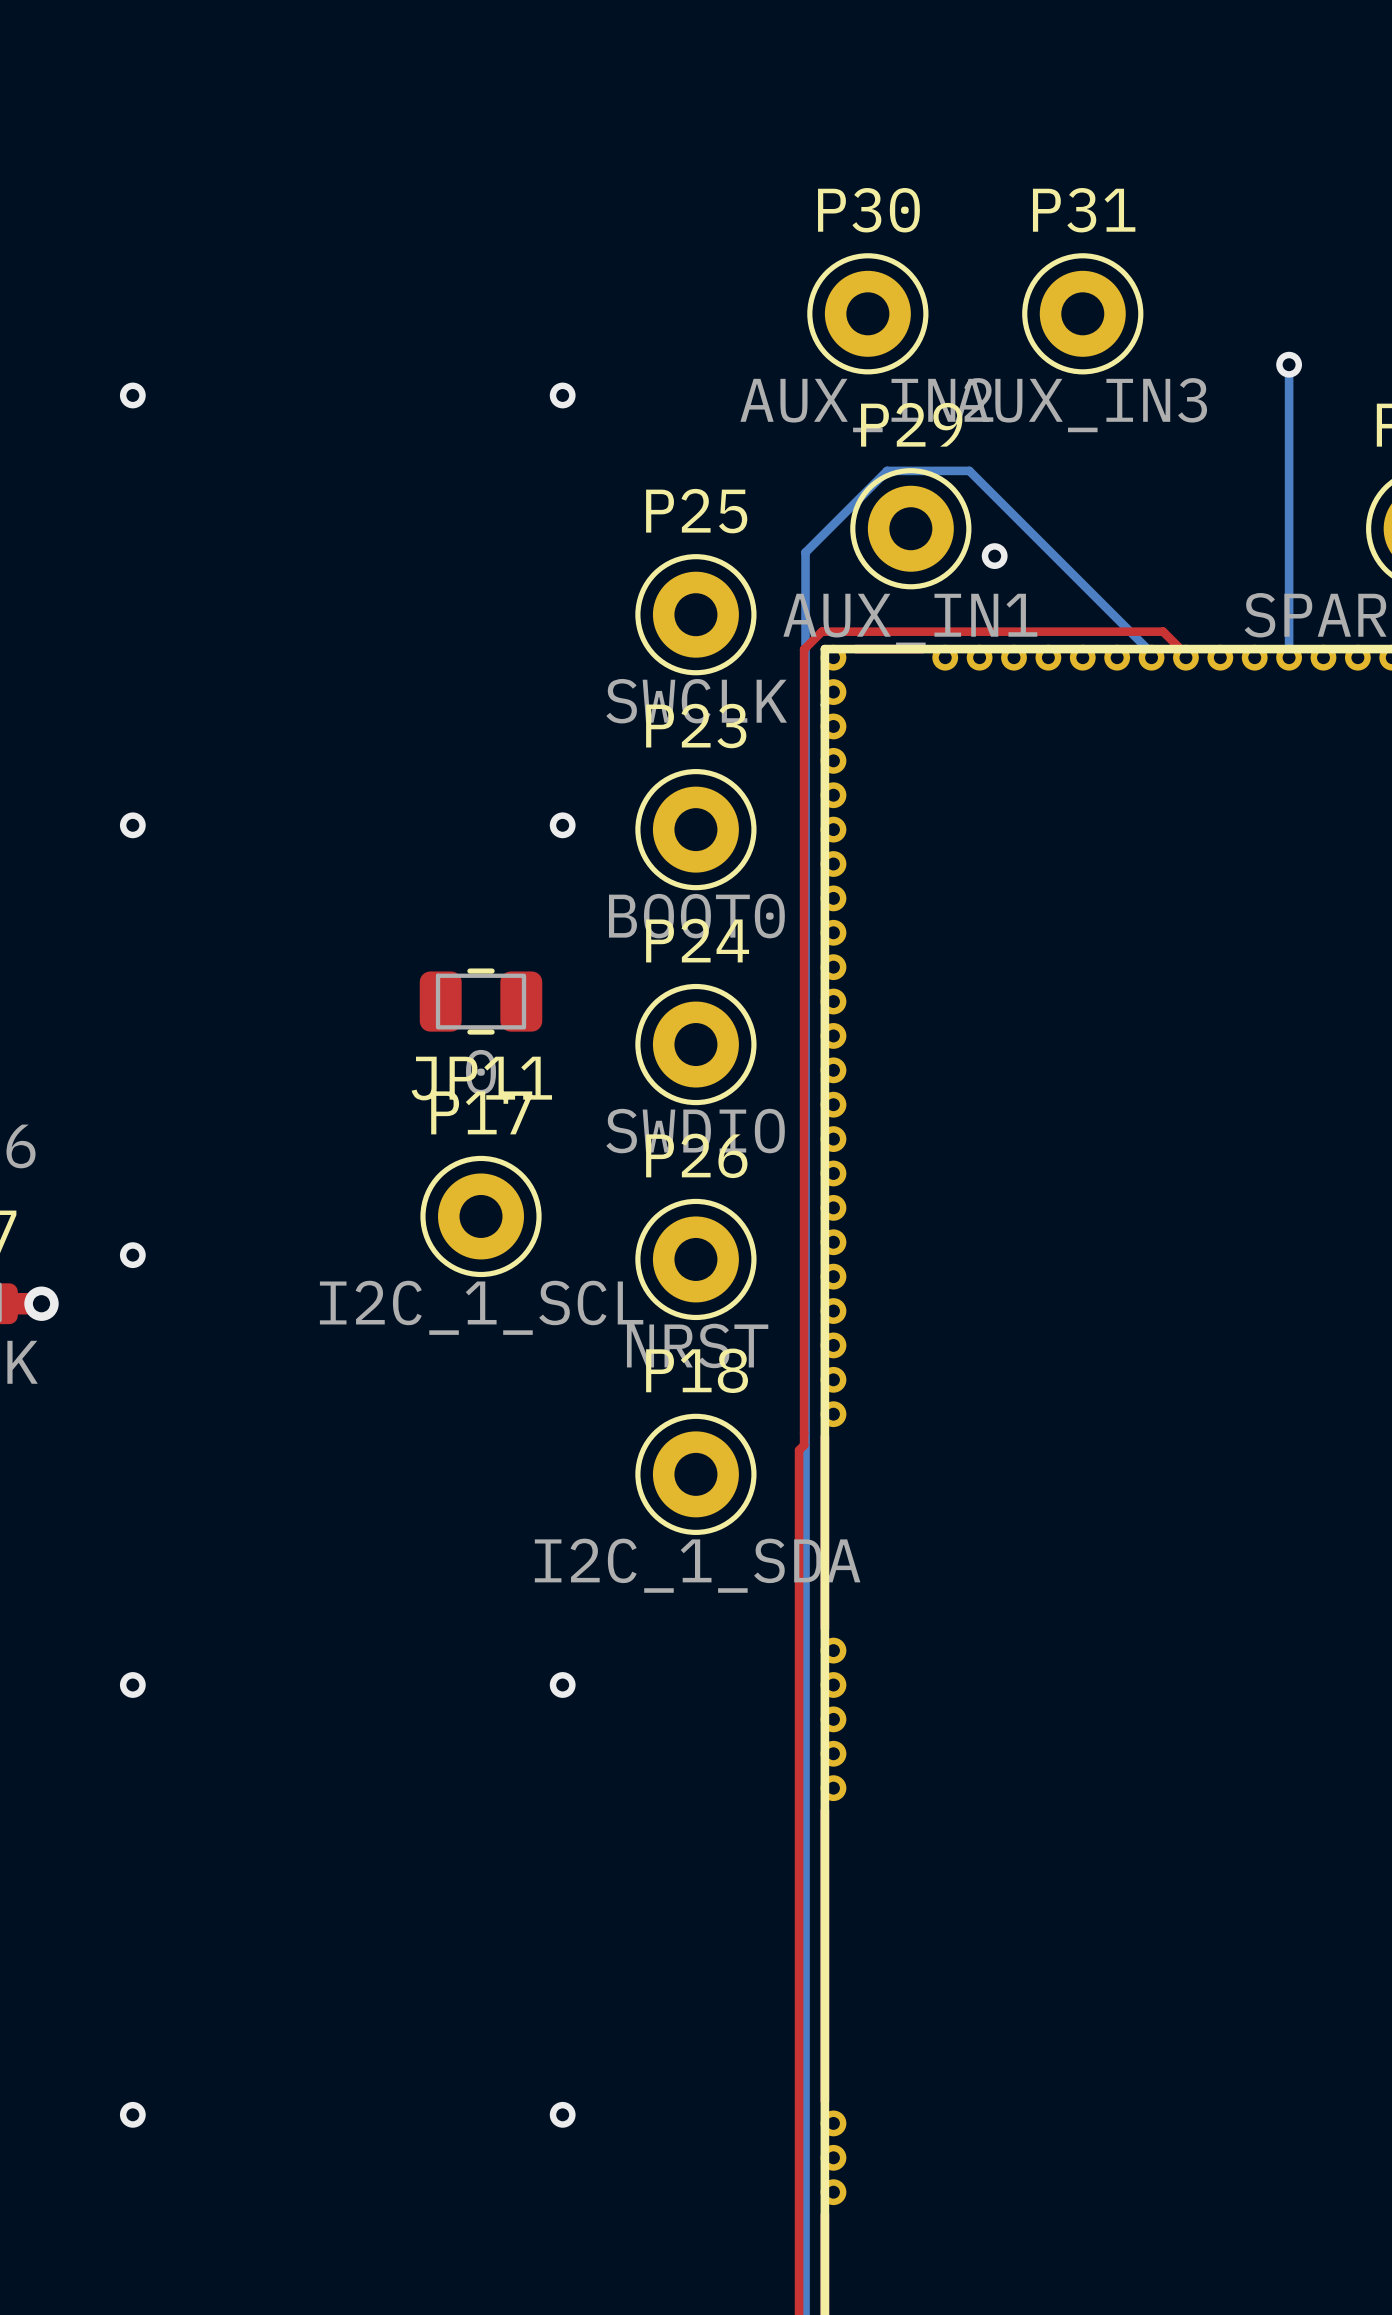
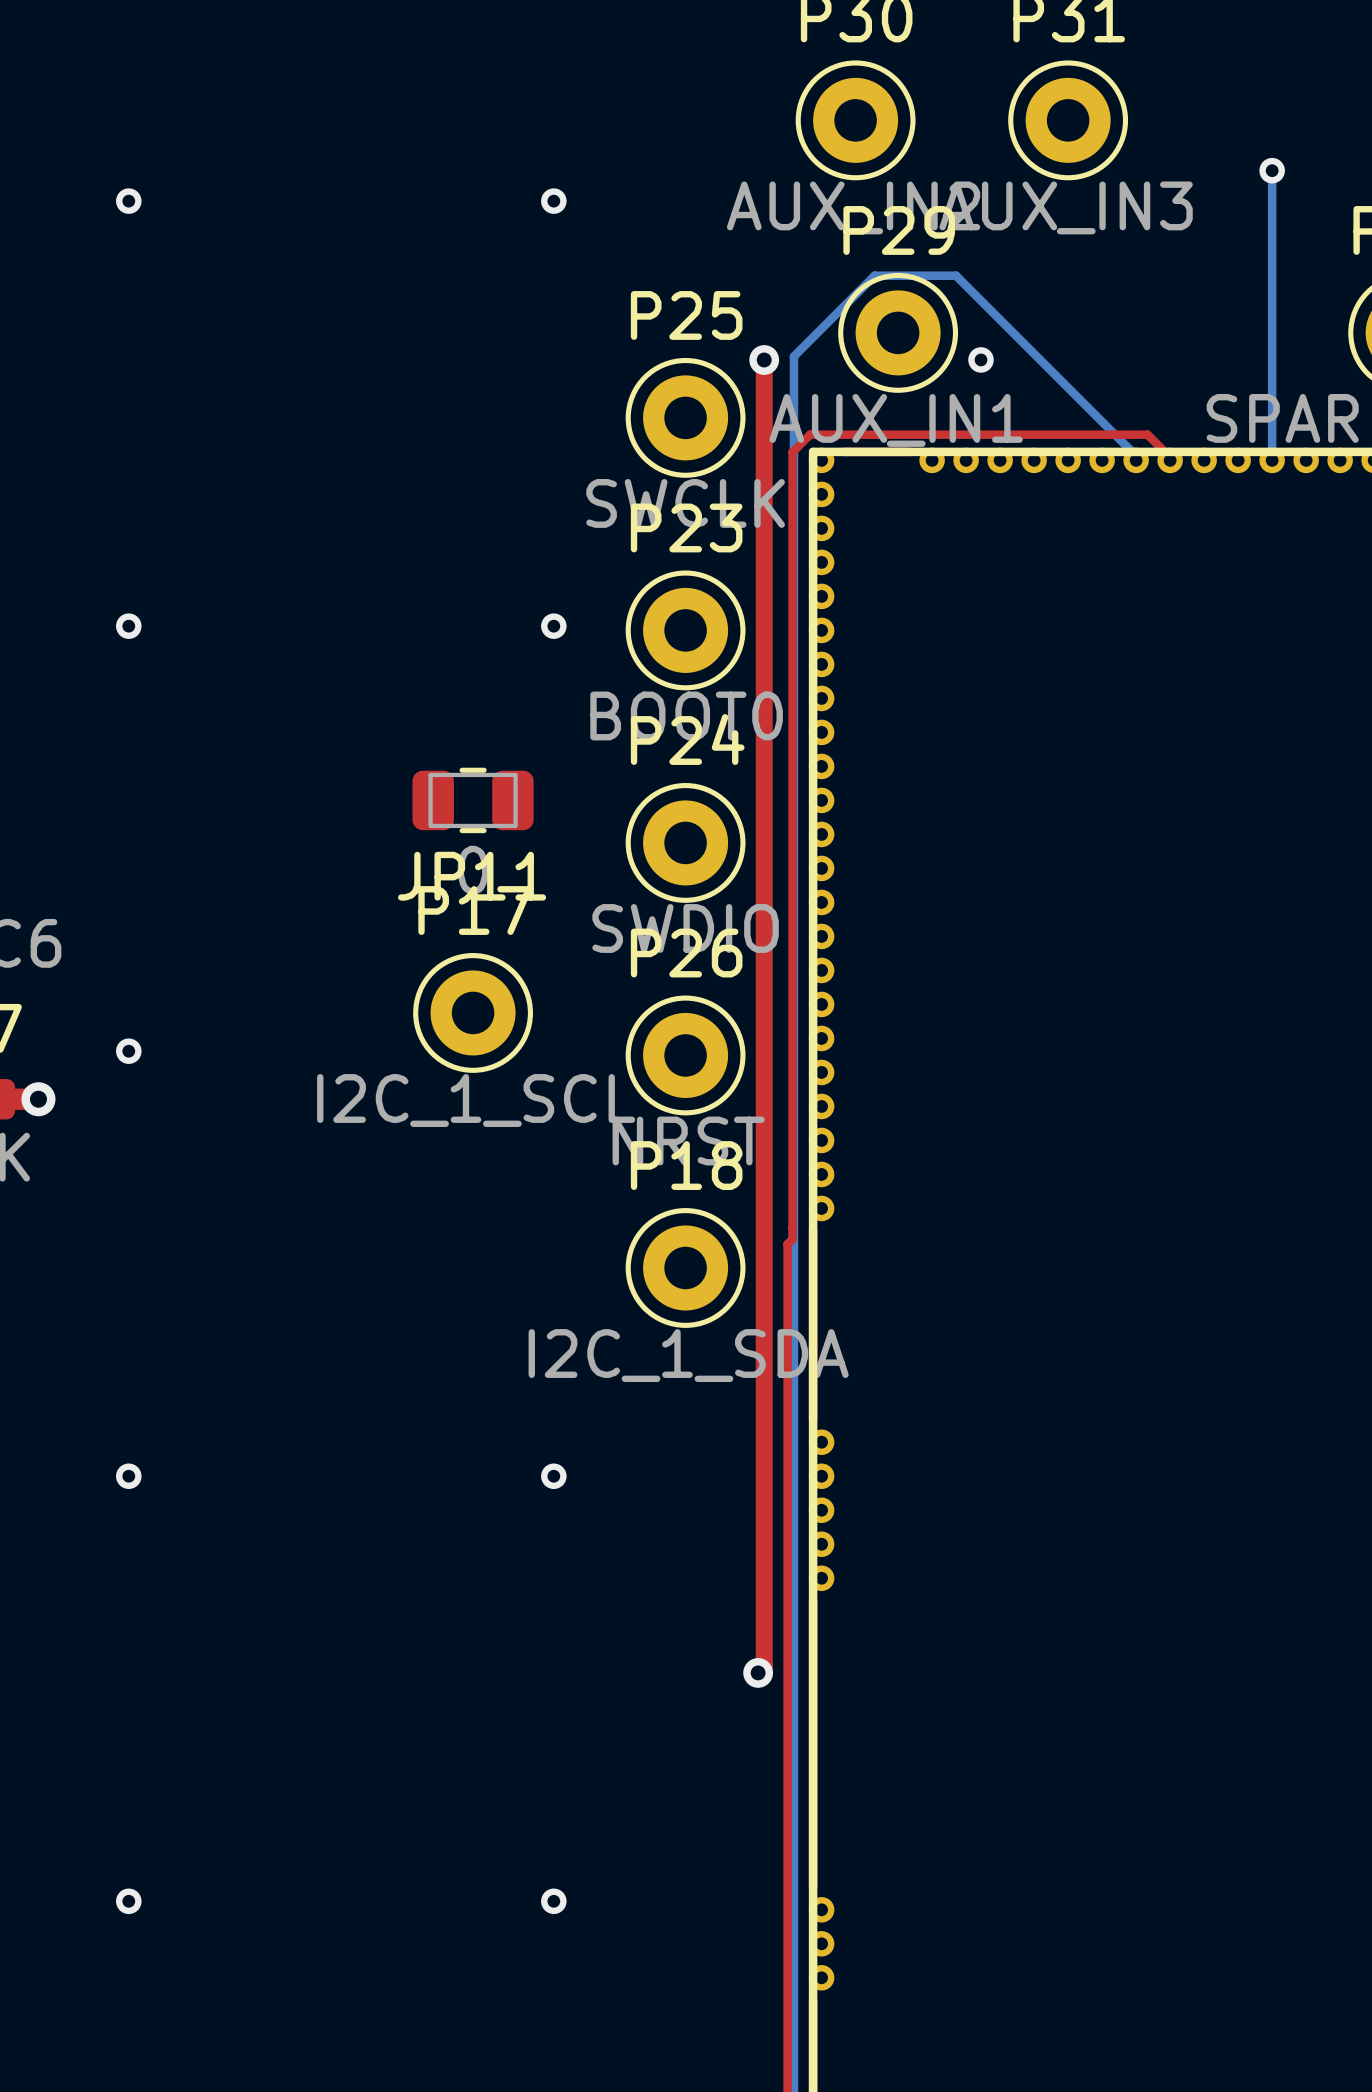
top track: none -> (764, 360) (764, 1666) (758, 1672)
via: none -> (764, 360)
via: none -> (758, 1672)

